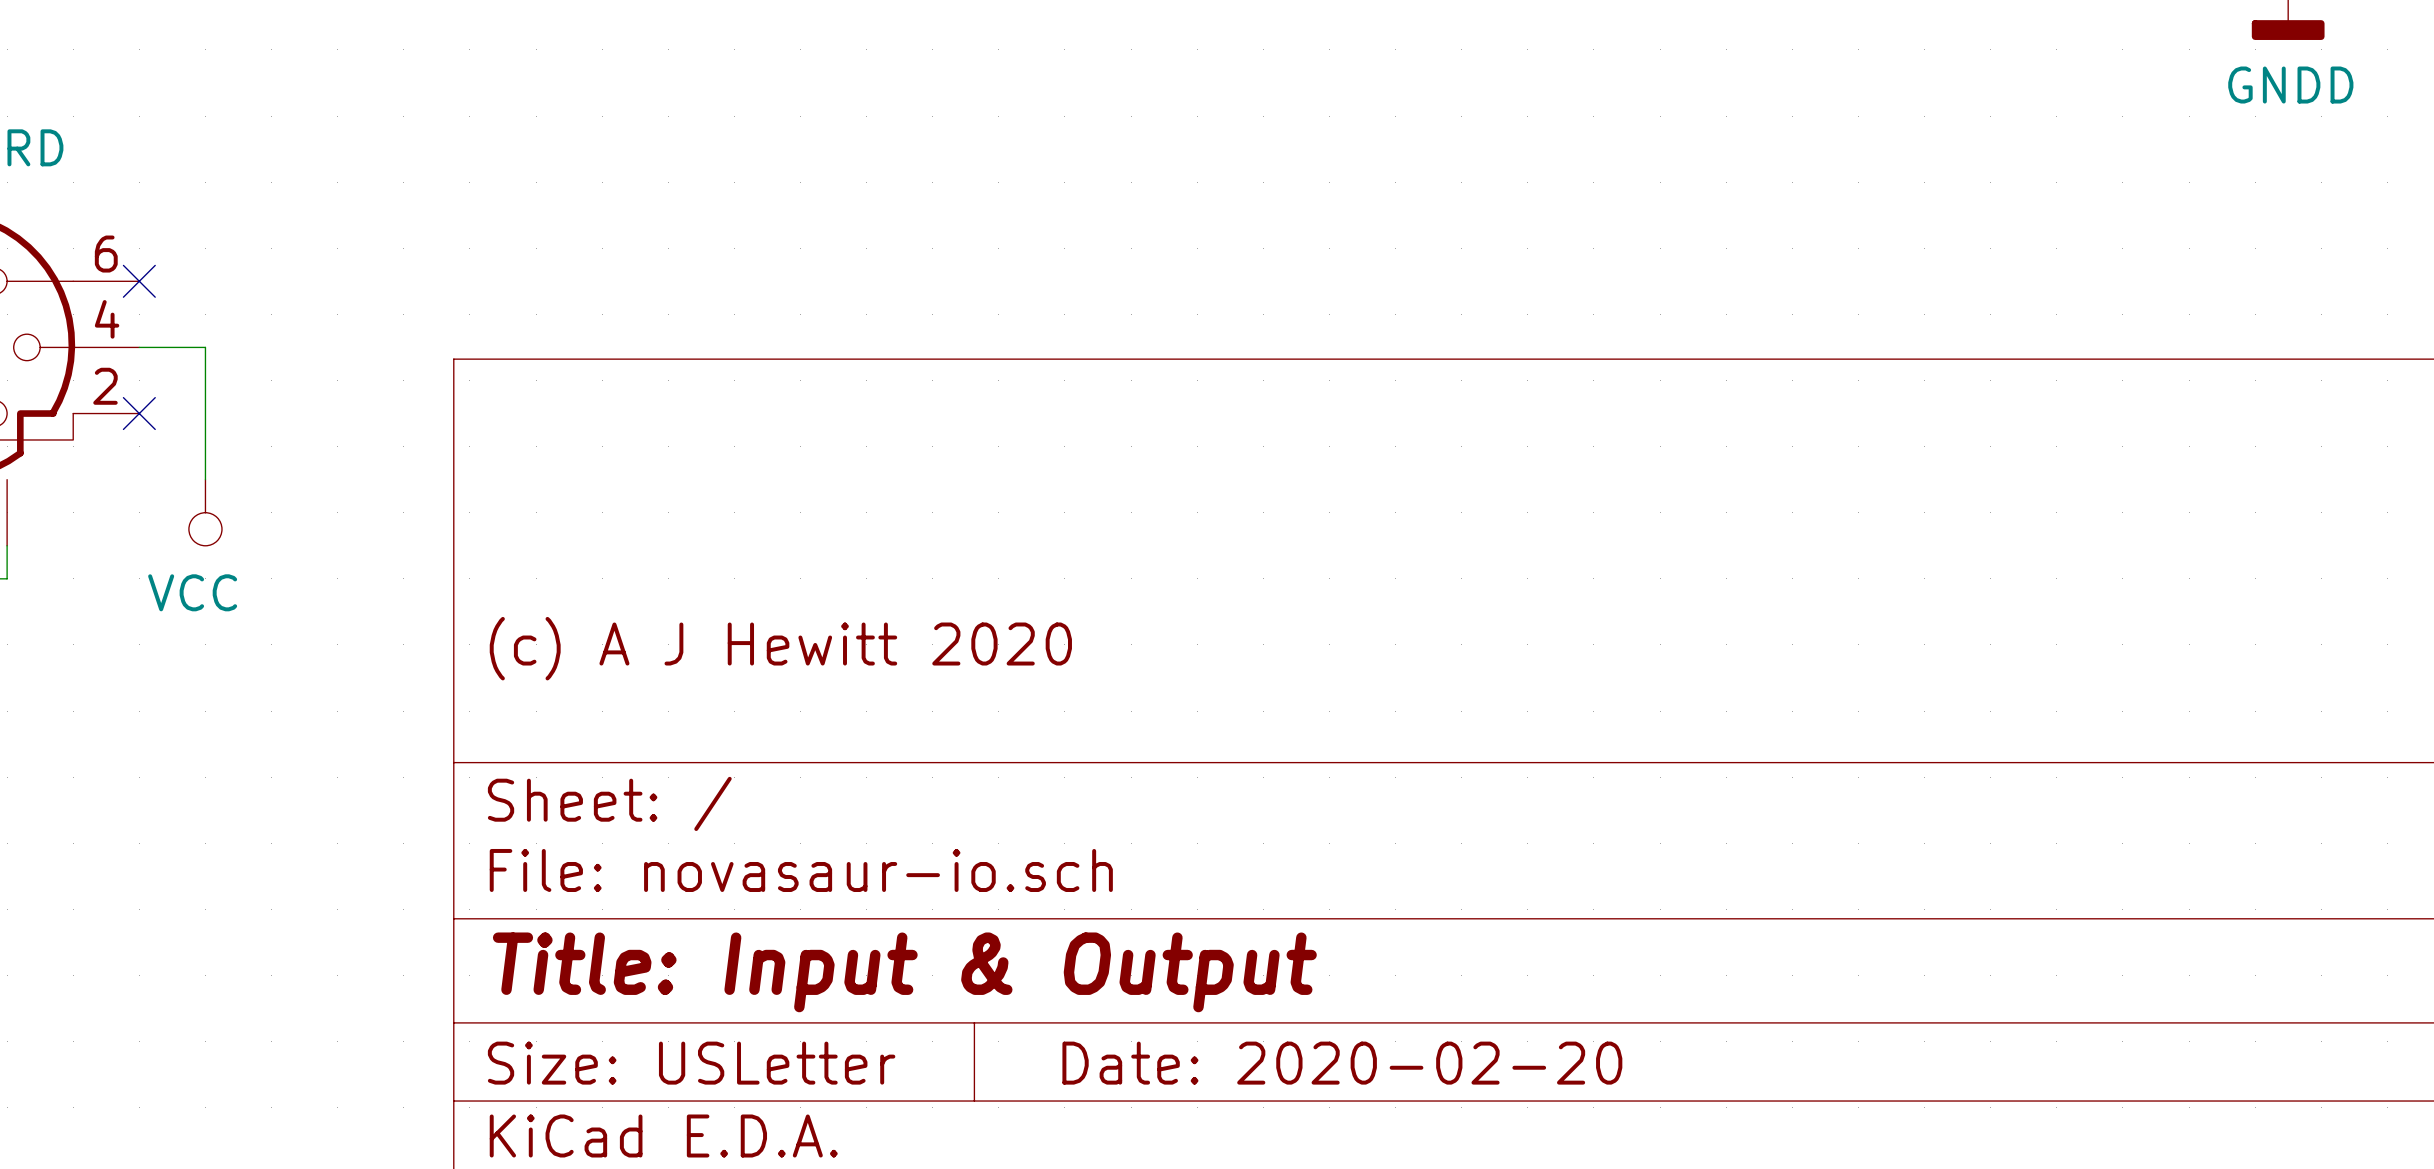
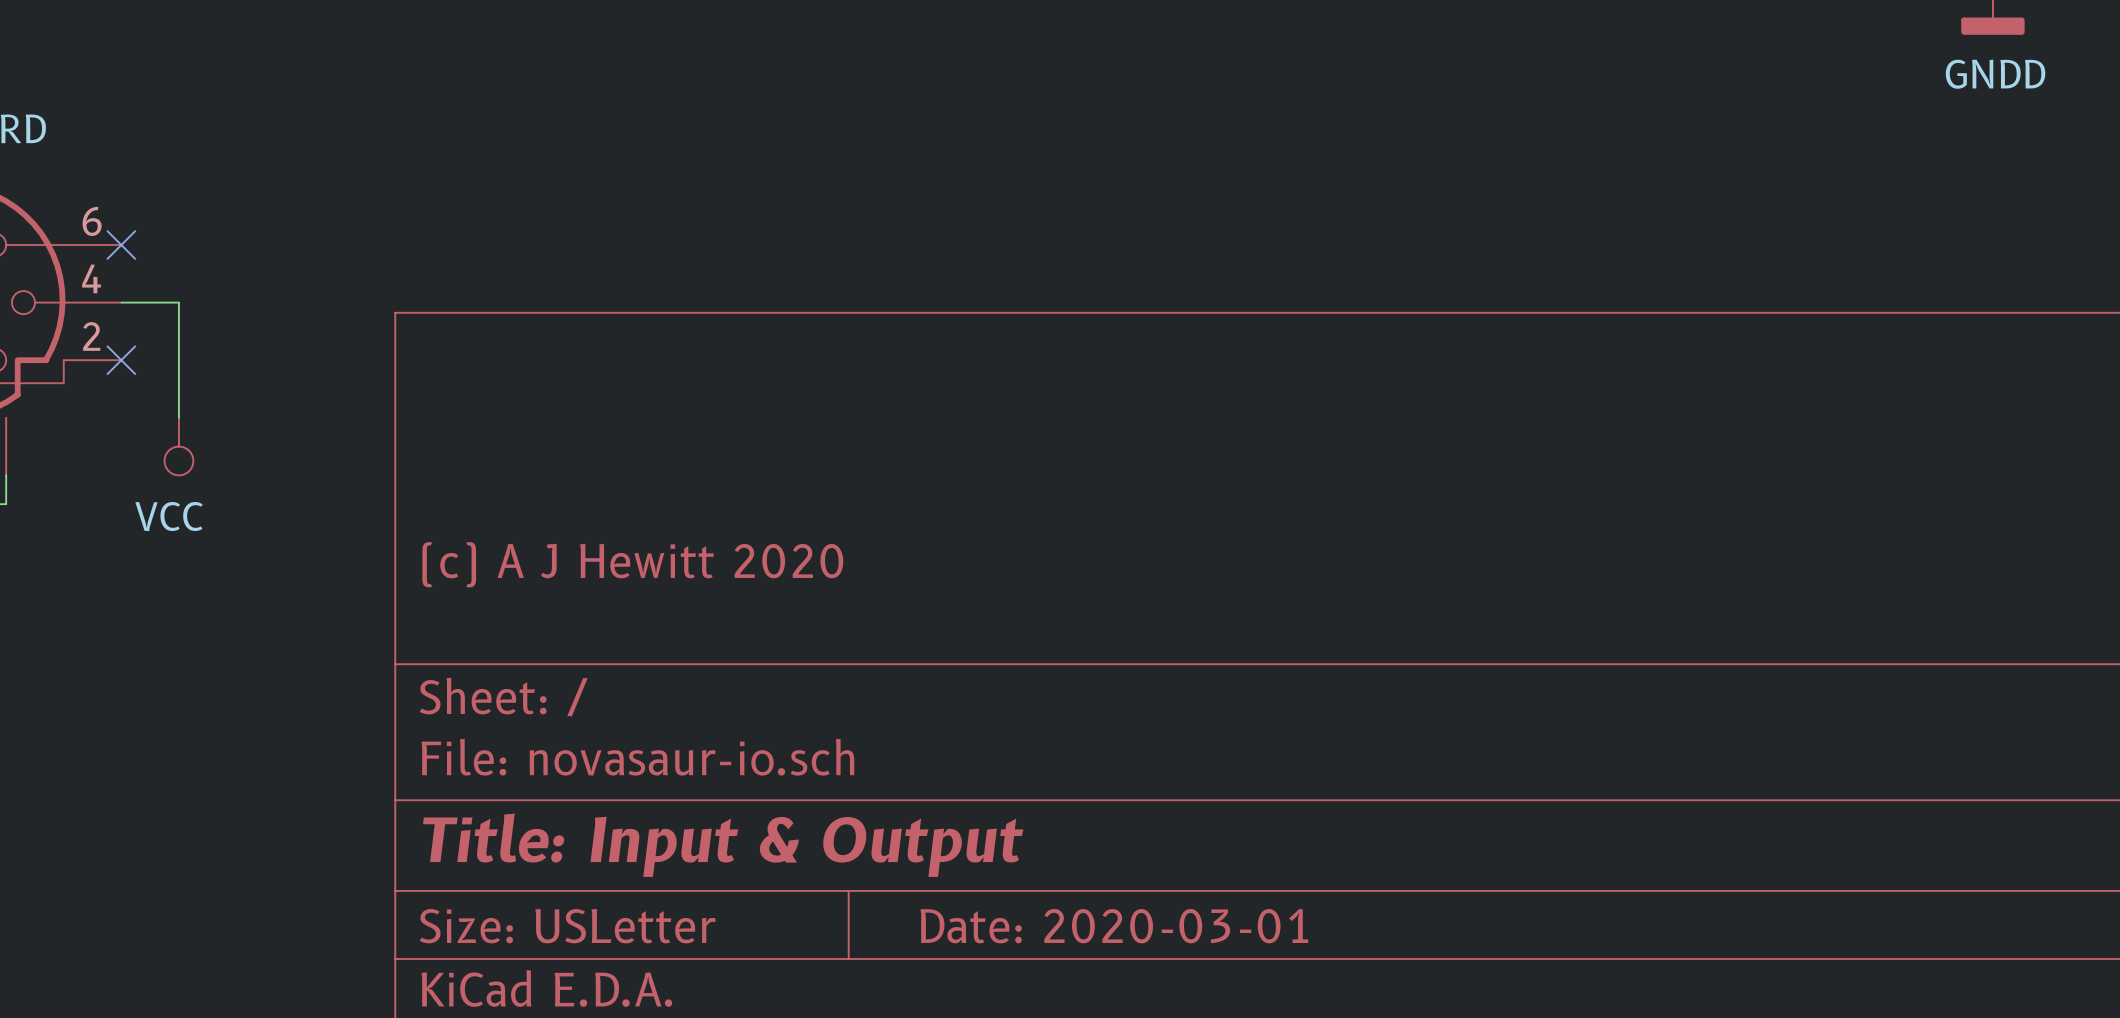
title block: Date: 2020-02-20 (1342, 1063) -> Date: 2020-03-01 (1114, 926)

